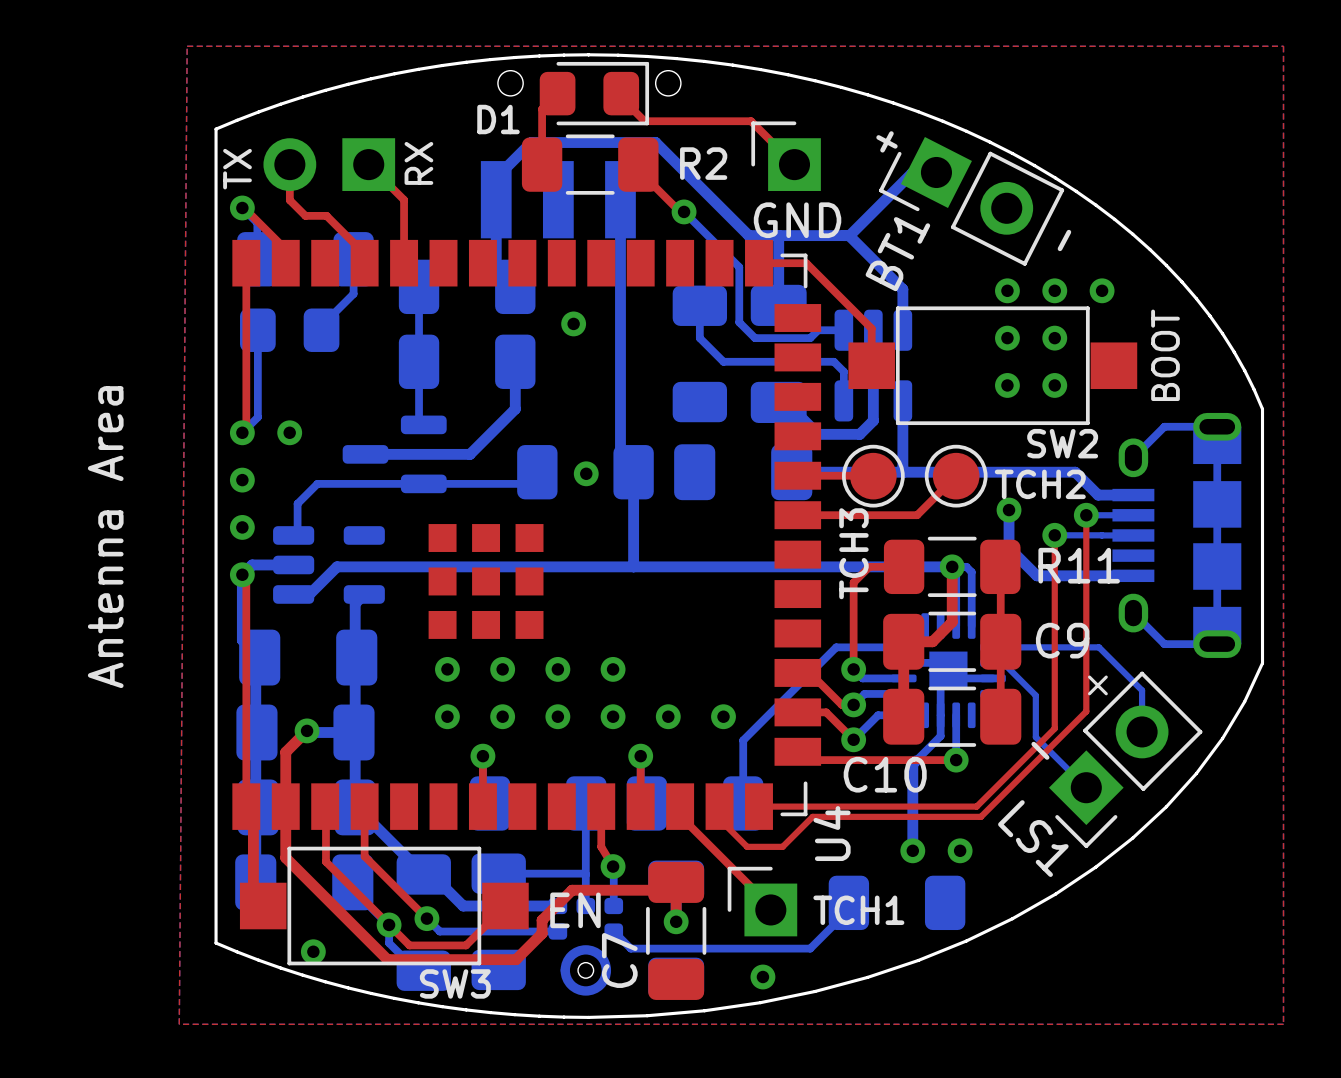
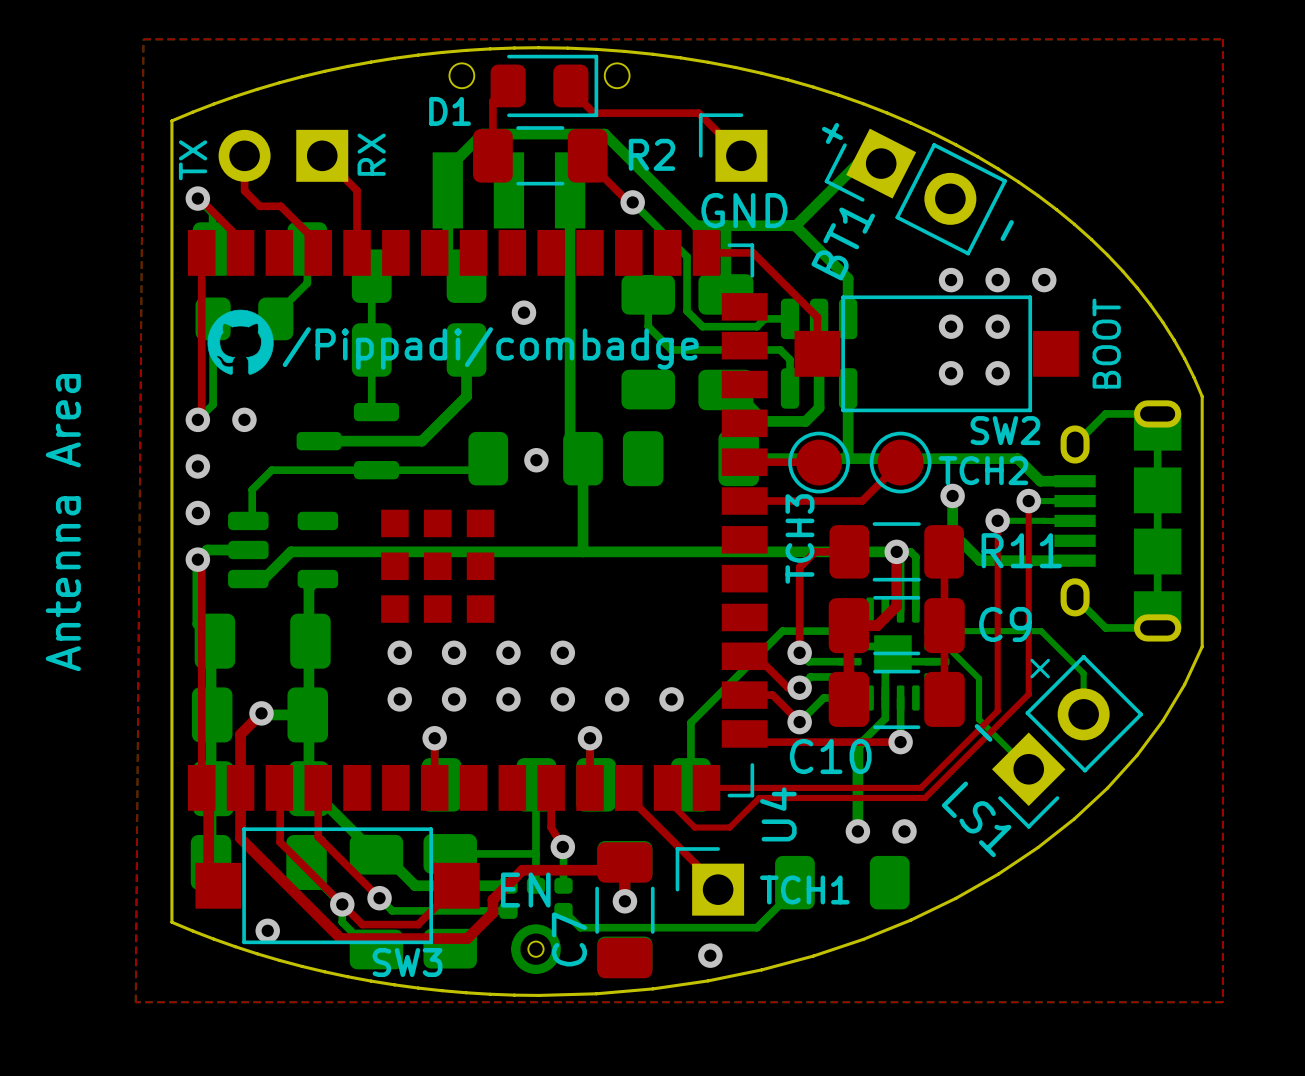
drawing: none -> [207, 309, 274, 375]
text: none -> /Pippadi/combadge (490, 348)

